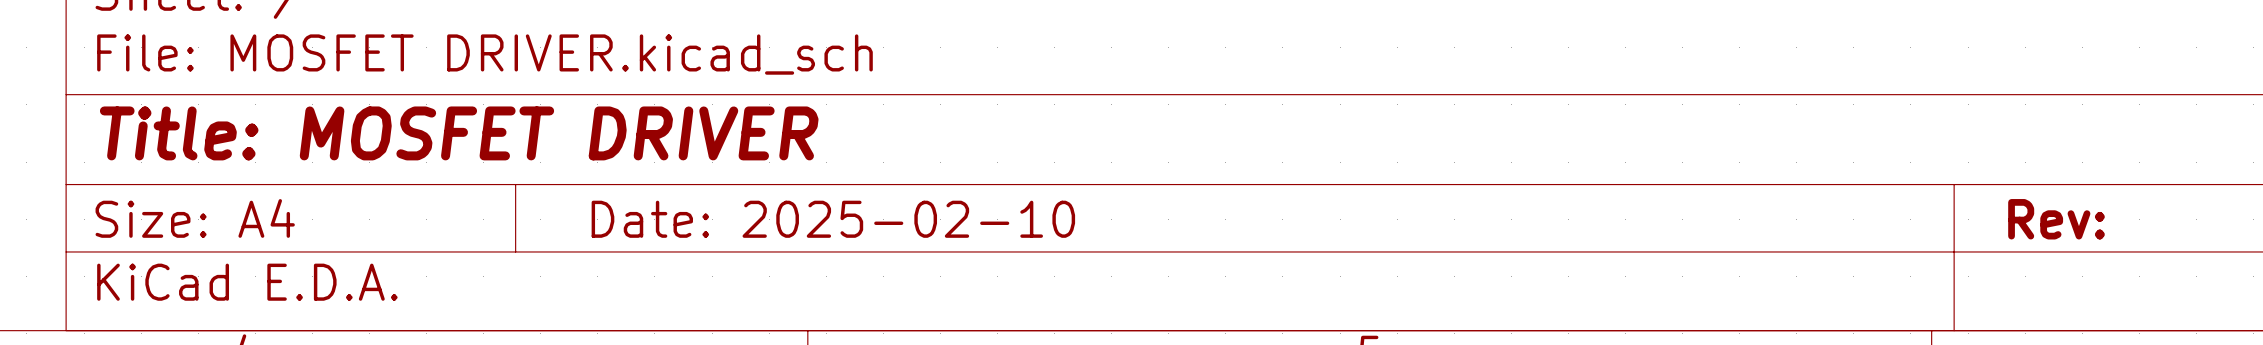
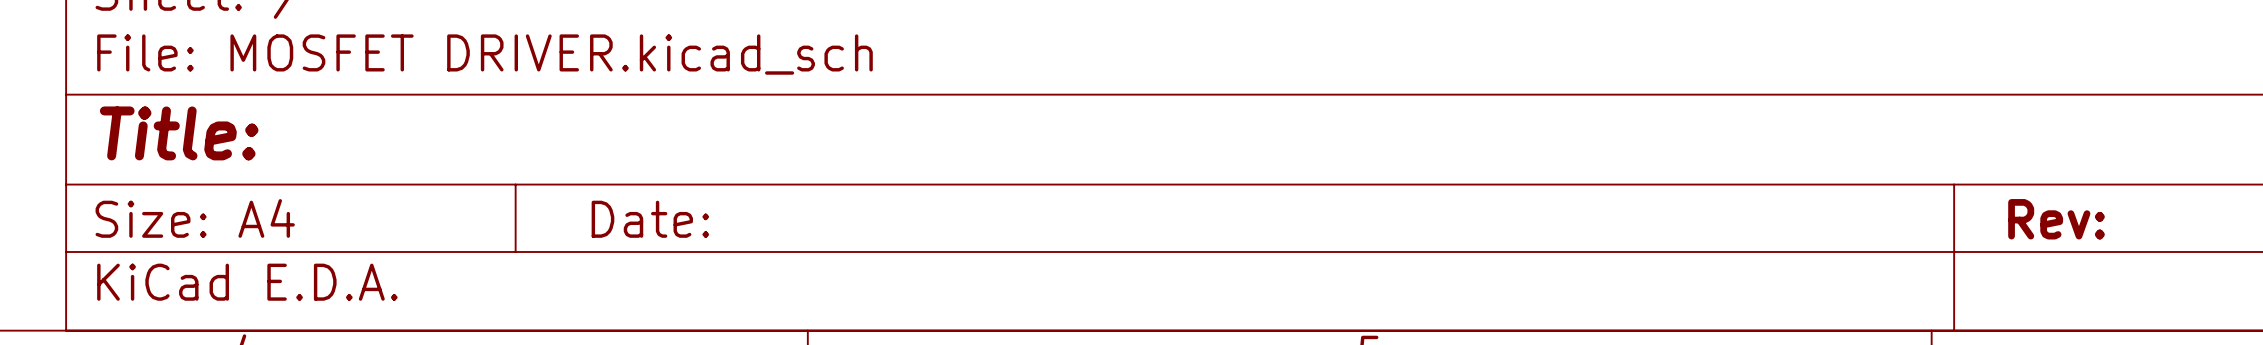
title block: Title: MOSFET DRIVER (459, 133) -> Title: (179, 133)
title block: Date: 2025-02-10 (833, 219) -> Date: (650, 219)

